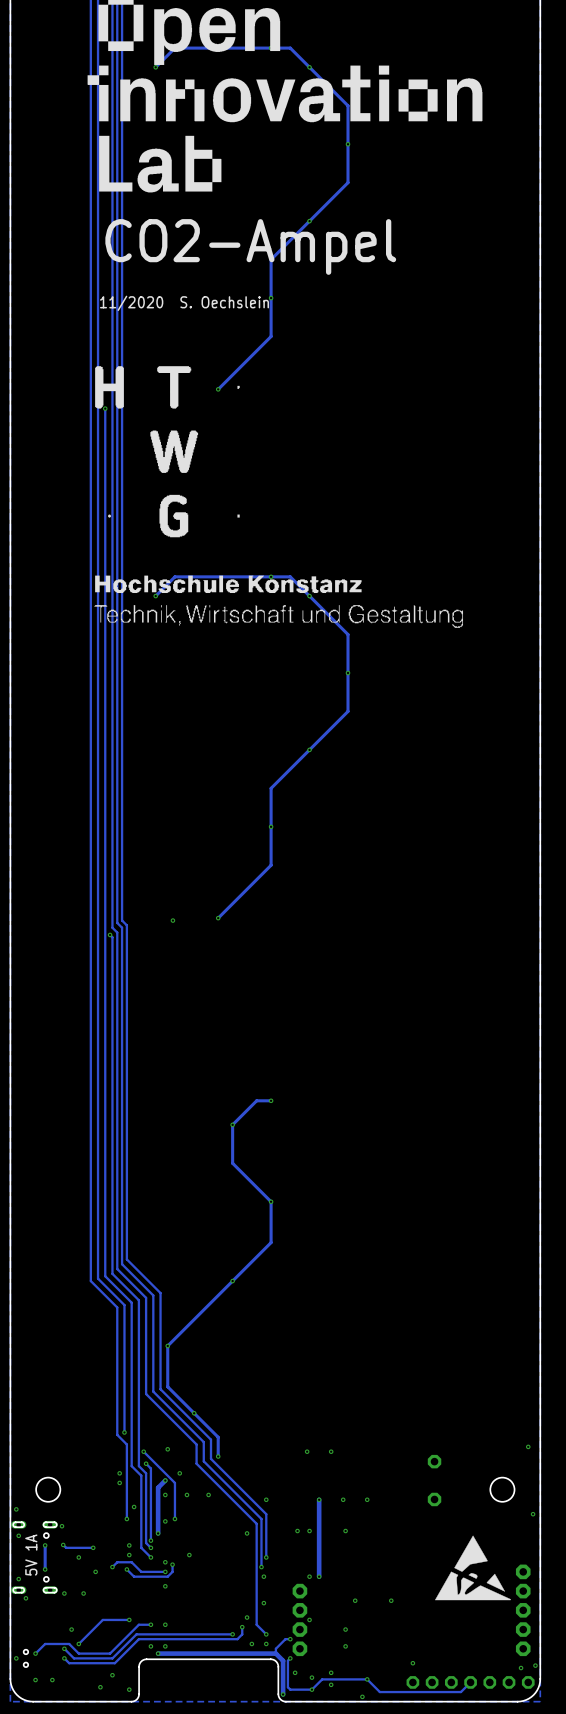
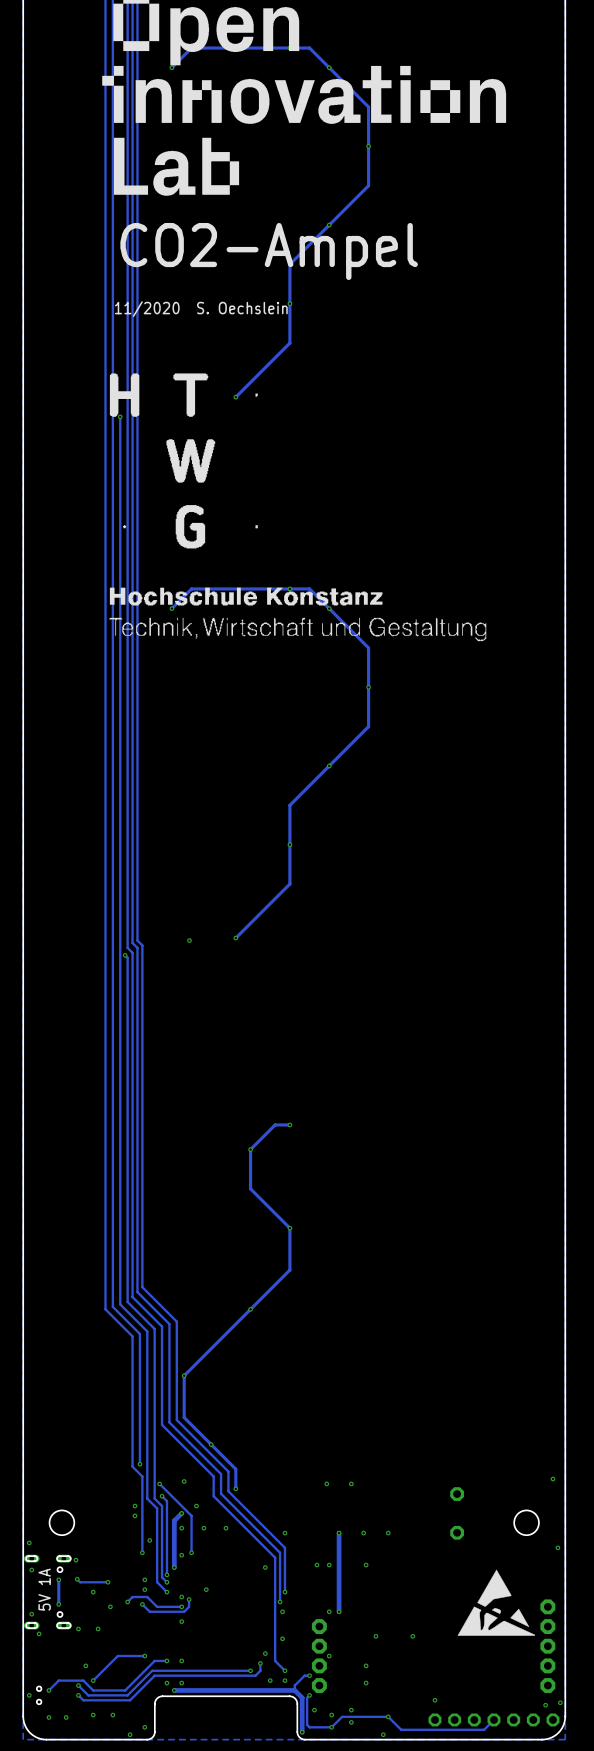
via: (112, 1675) -> none
via: none -> (93, 1715)
via: none -> (112, 1715)
via: (100, 1687) -> none
via: none -> (130, 1734)

